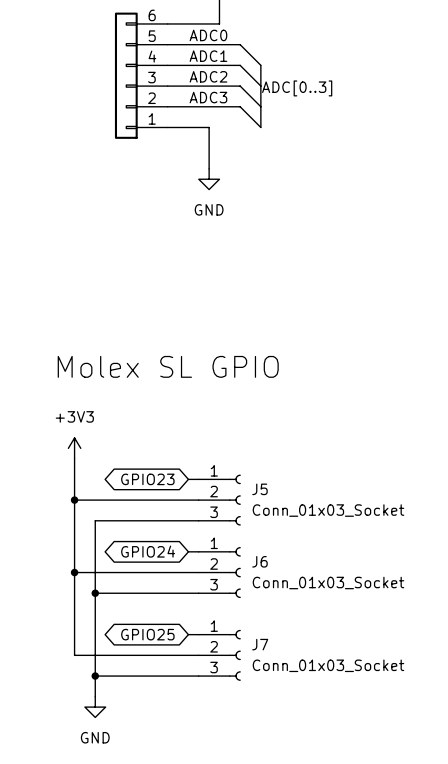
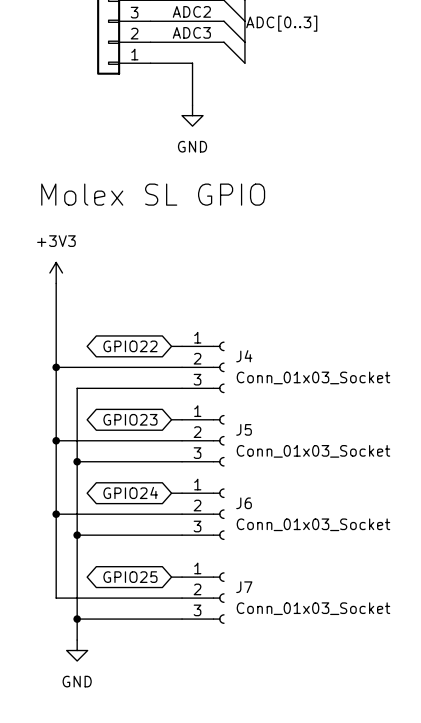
wire: none -> (56, 283) (56, 398)
text position: Molex SL GPIO (168, 366) -> Molex SL GPIO (153, 194)
global label: none -> GPIO22 (130, 346)
wire: none -> (171, 346) (182, 346)
wire: none -> (56, 367) (182, 367)
junction: none -> (56, 367)
J4: none -> Conn_01x03_Socket (203, 367)
power symbol position: +3V3 (74, 448) -> +3V3 (56, 272)
wire: none -> (182, 388) (77, 388) (77, 461)
junction: none -> (77, 461)

